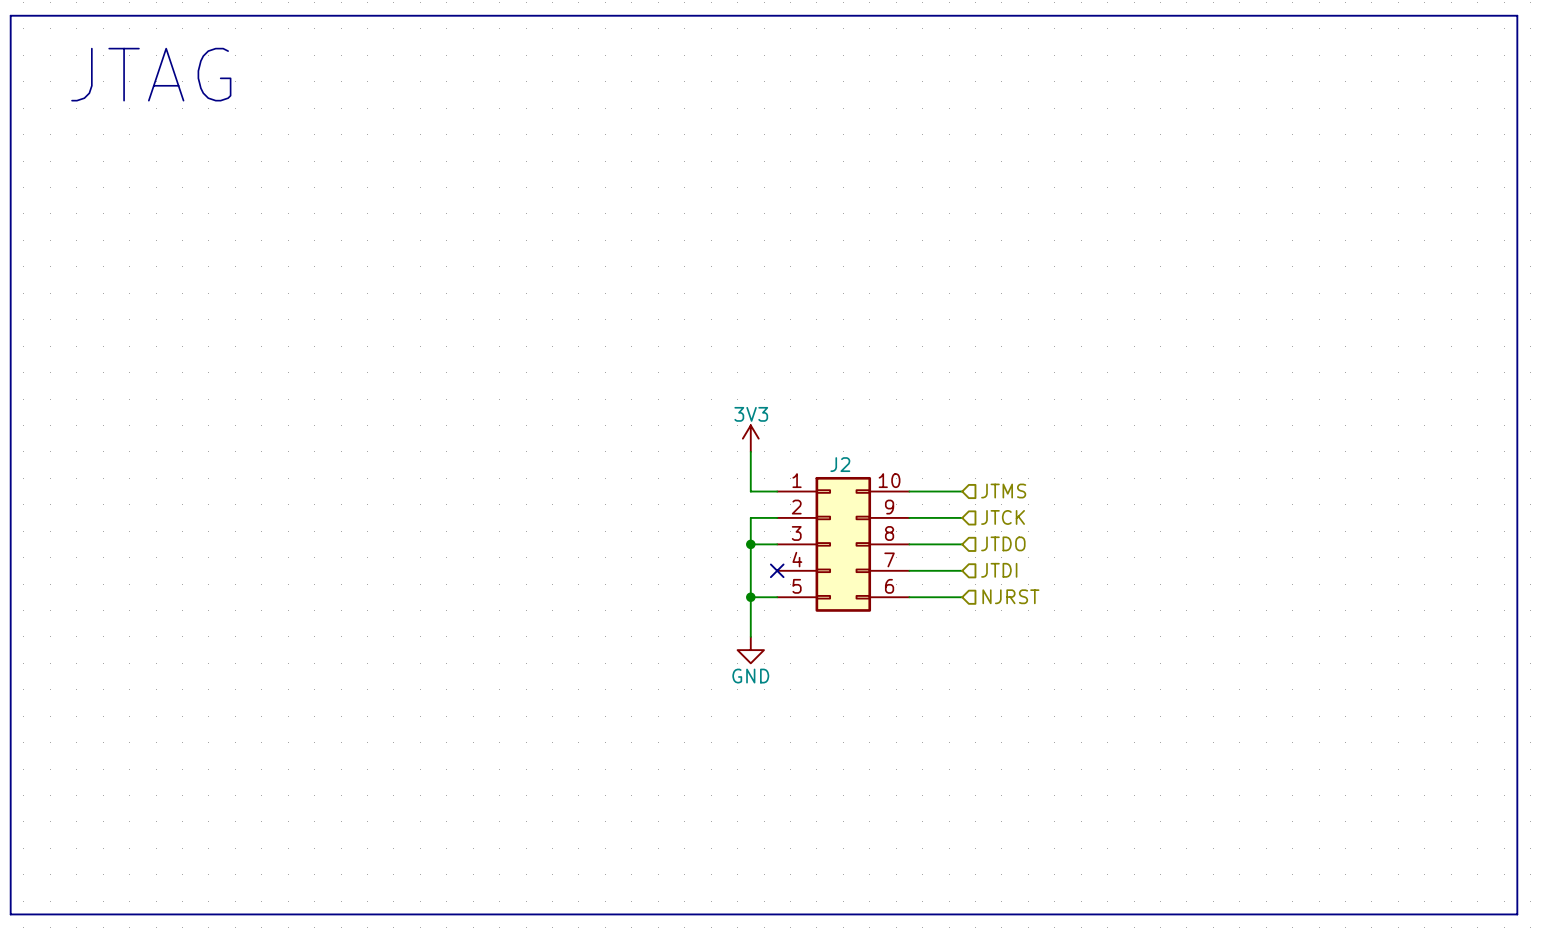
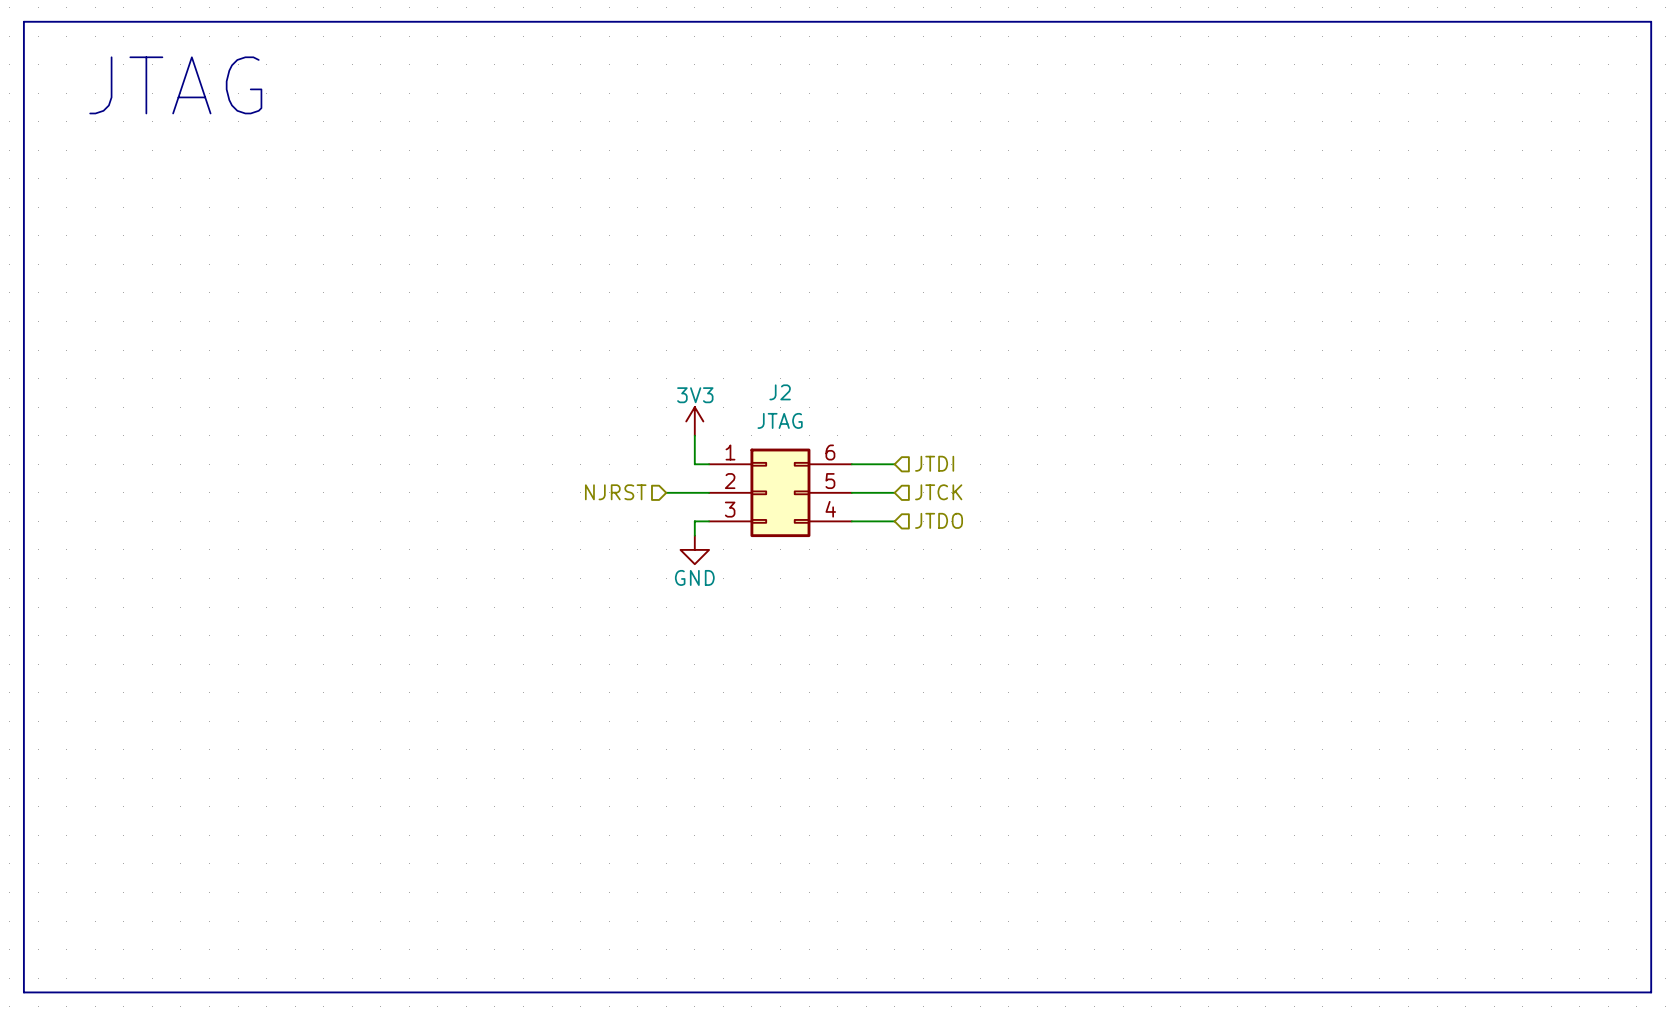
J2 value: none -> JTAG (780, 420)
wire: none -> (694, 435) (694, 464) (709, 464)
wire: none -> (851, 464) (894, 464)
power symbol position: 3V3 (750, 438) -> 3V3 (694, 421)
hierarchical label: none -> NJRST (615, 492)
wire: none -> (666, 492) (709, 492)
wire: (750, 451) (750, 491) (777, 491) -> none
wire: none -> (851, 492) (894, 492)
J2 symbol: [777, 476, 910, 612] -> [709, 448, 852, 538]
wire: none -> (709, 521) (694, 521) (694, 535)
wire: none -> (851, 521) (894, 521)
wire: (909, 491) (962, 491) -> none
hierarchical label: JTMS (1003, 491) -> none
wire: (777, 517) (750, 517) (750, 636) -> none
wire: (909, 517) (962, 517) -> none
hierarchical label position: JTCK (1003, 517) -> JTCK (938, 492)
hierarchical label position: JTDO (1003, 543) -> JTDO (939, 520)
wire: (750, 544) (777, 544) -> none
junction: (750, 544) -> none
wire: (909, 544) (962, 544) -> none
no-connect mark: (777, 570) -> none
wire: (909, 570) (962, 570) -> none
hierarchical label position: JTDI (999, 570) -> JTDI (934, 463)
hierarchical label: NJRST (1010, 596) -> none
wire: (750, 597) (777, 597) -> none
junction: (750, 597) -> none
wire: (909, 597) (962, 597) -> none
power symbol position: GND (750, 650) -> GND (694, 549)

